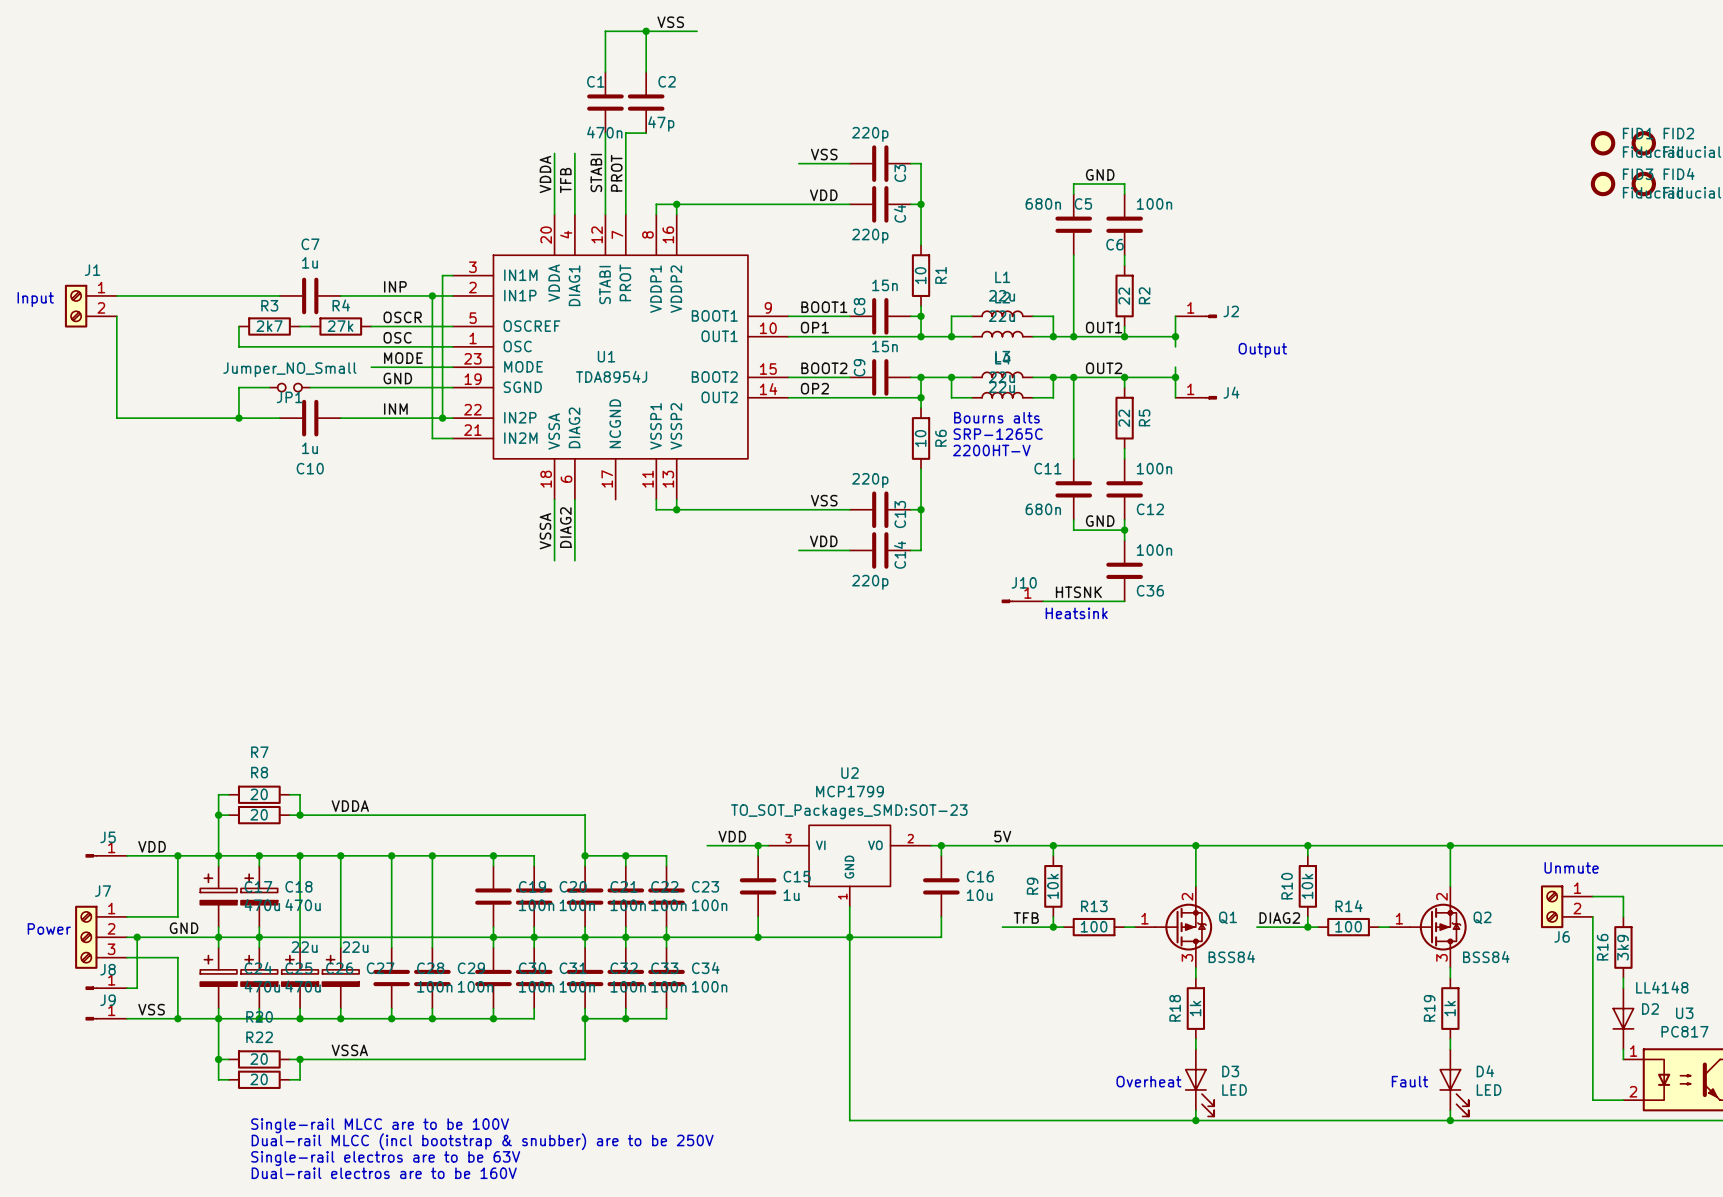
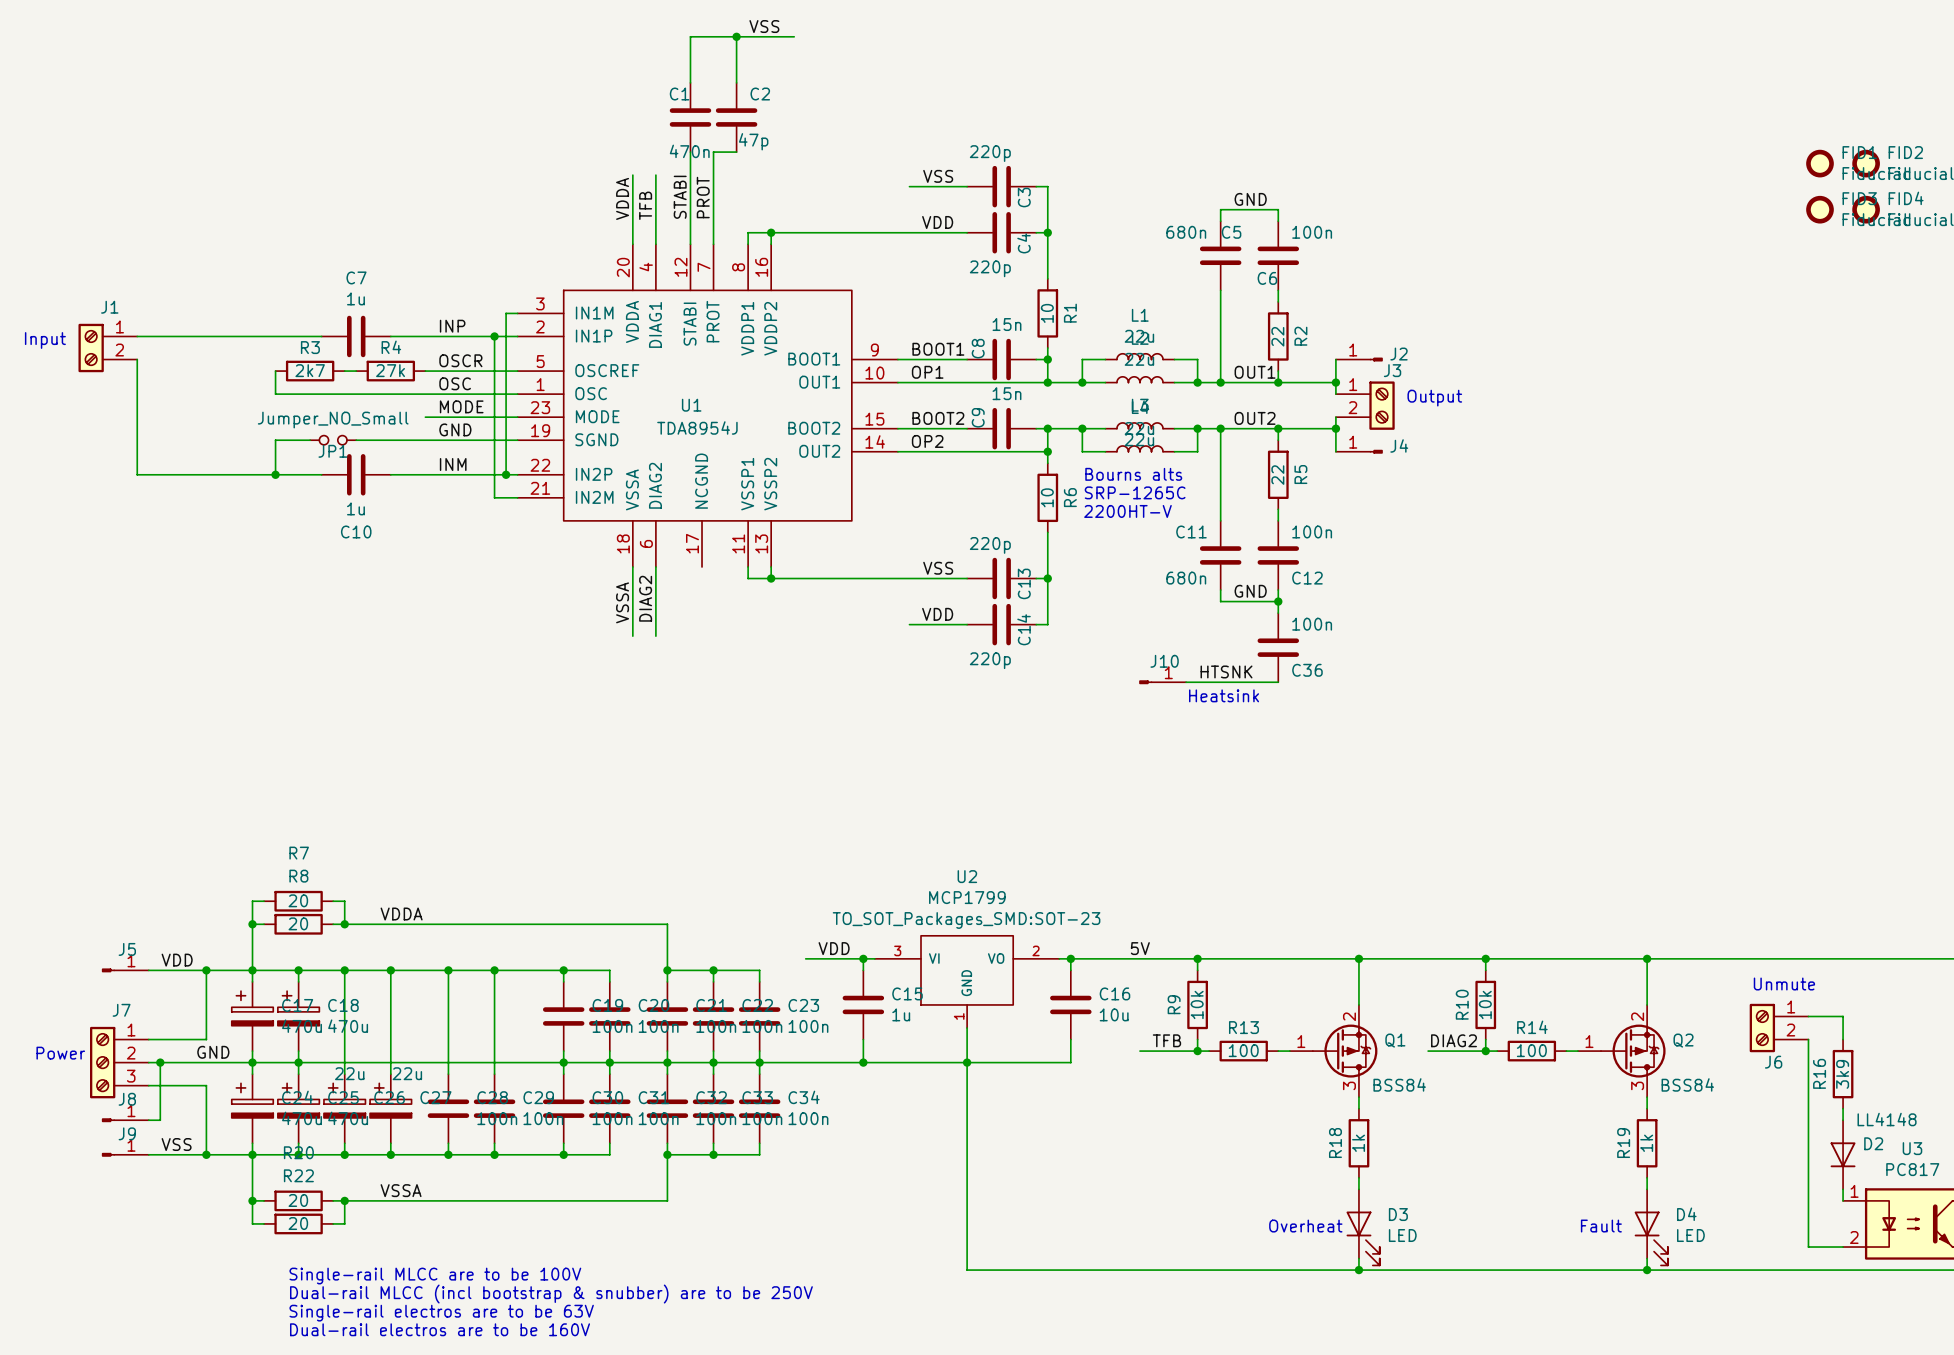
J3: none -> (1365, 405)

